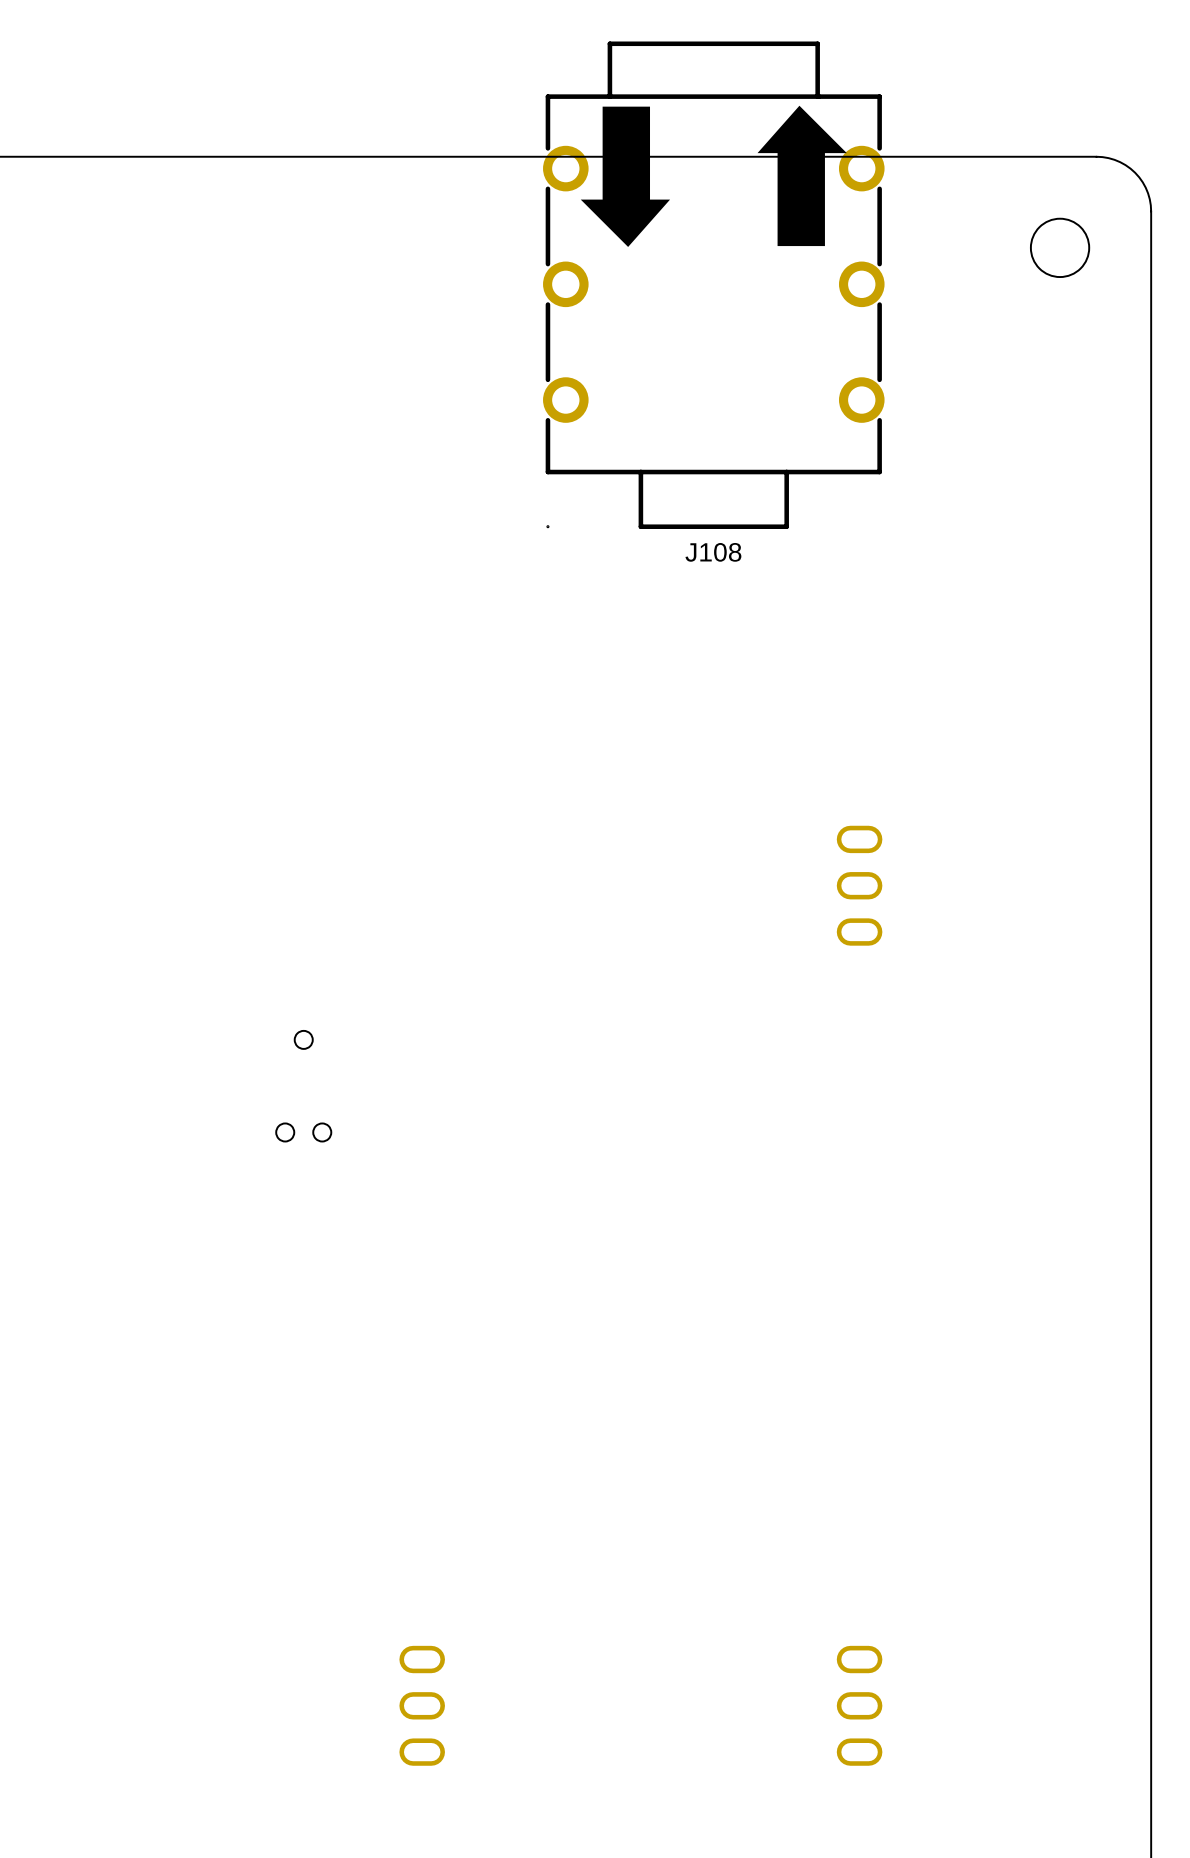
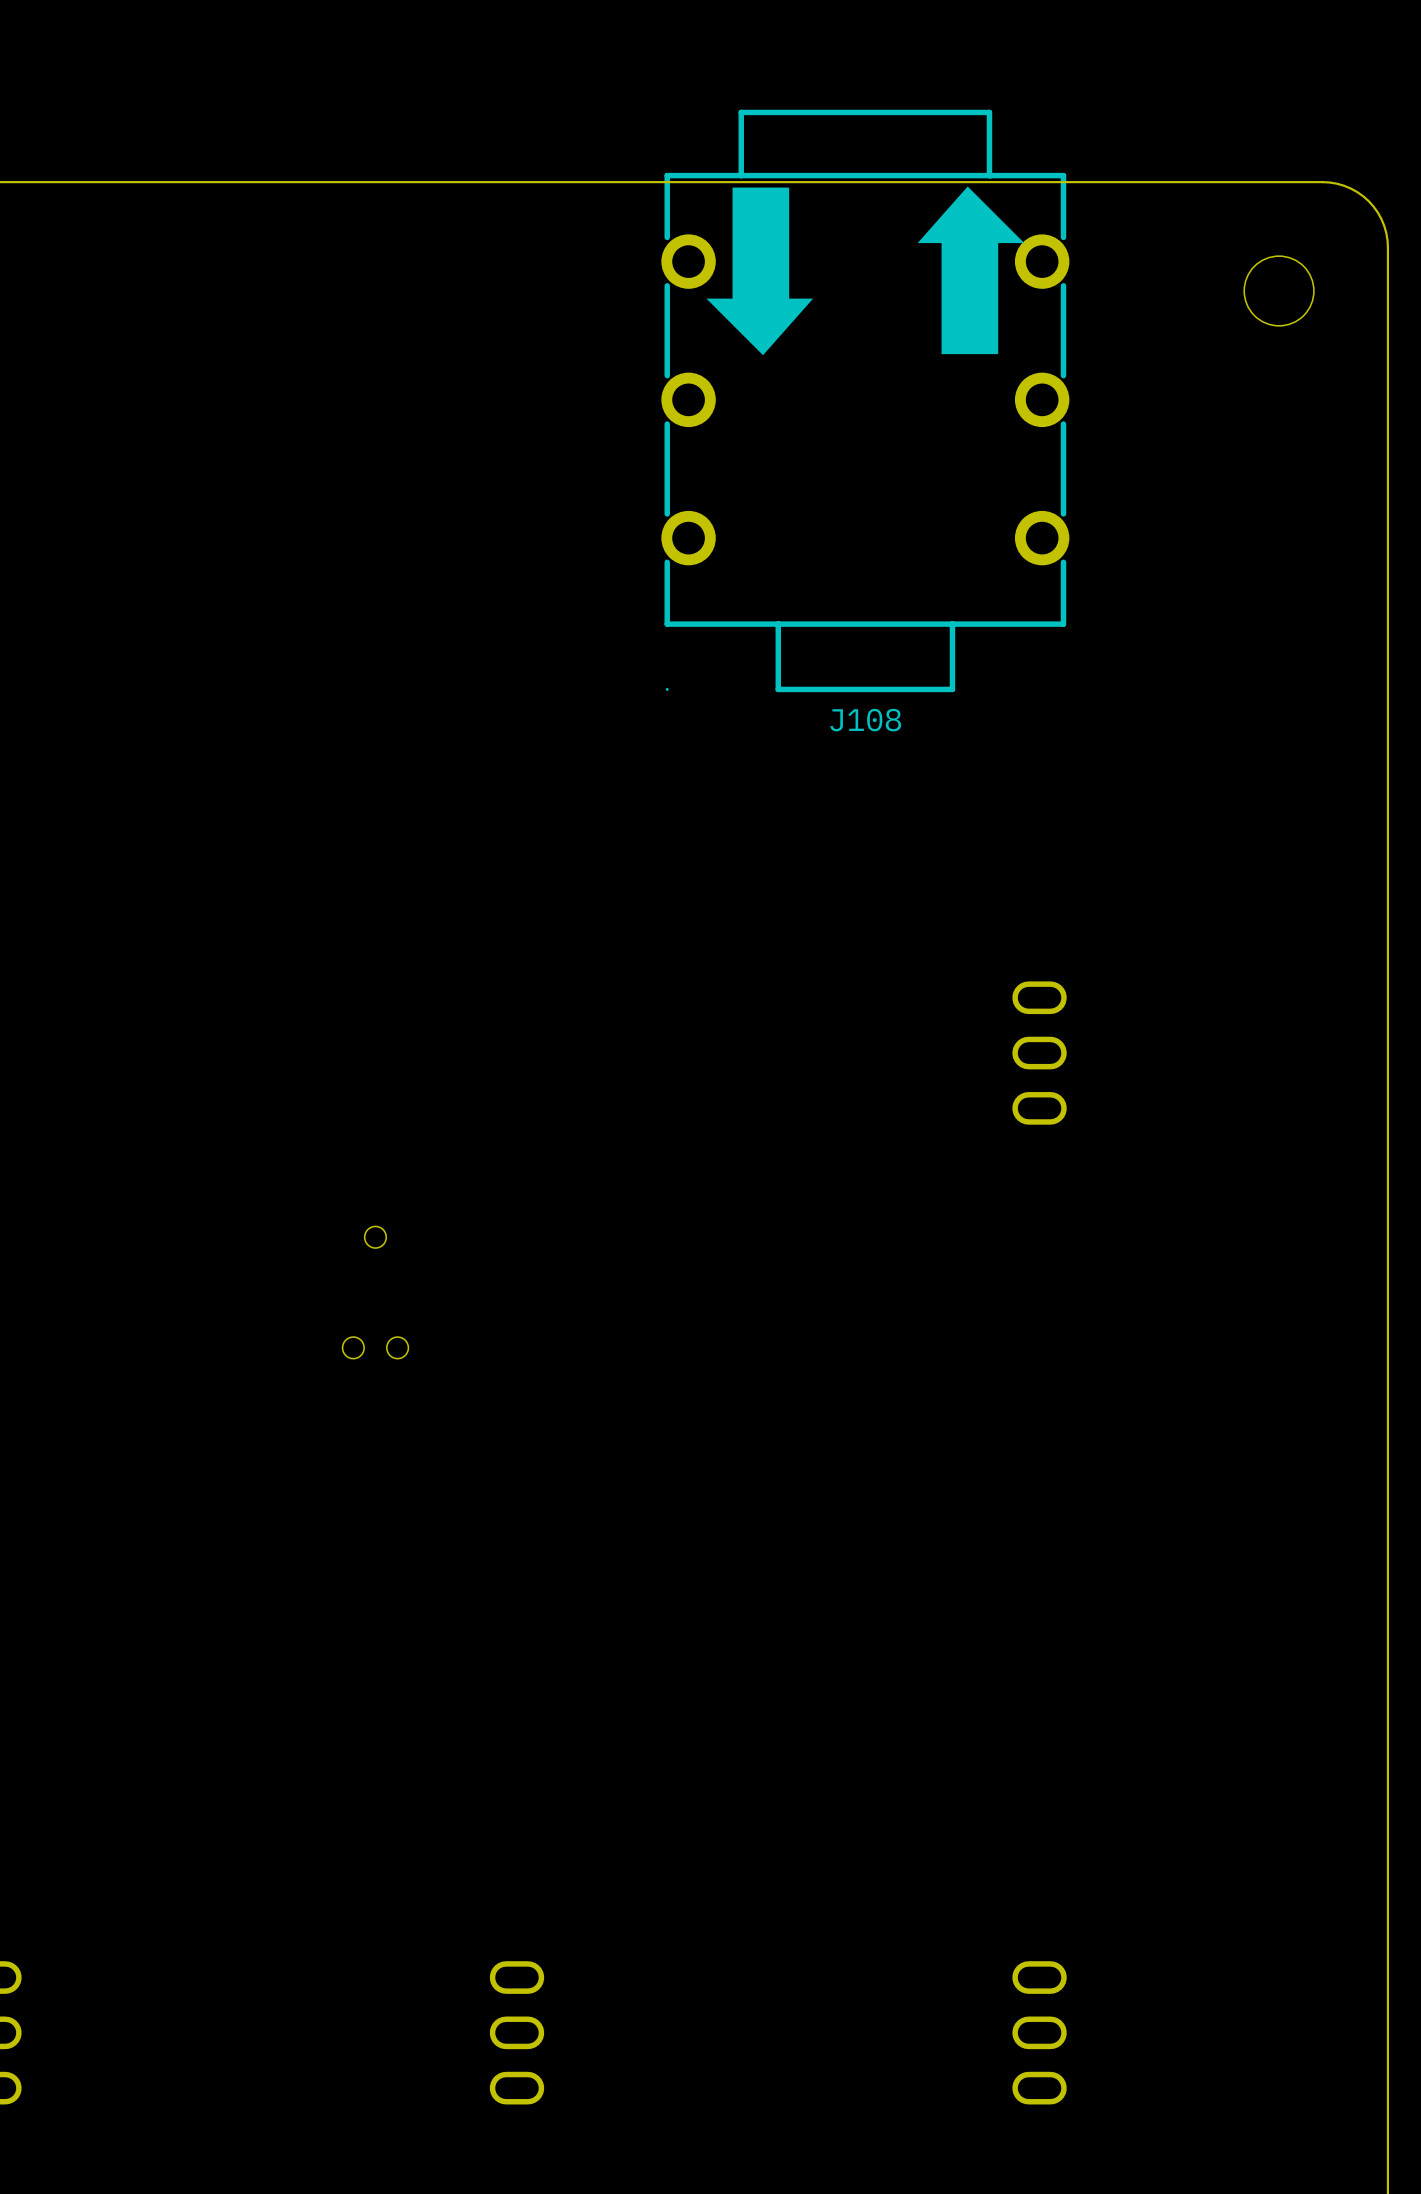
J108 position: (713, 285) -> (865, 400)

